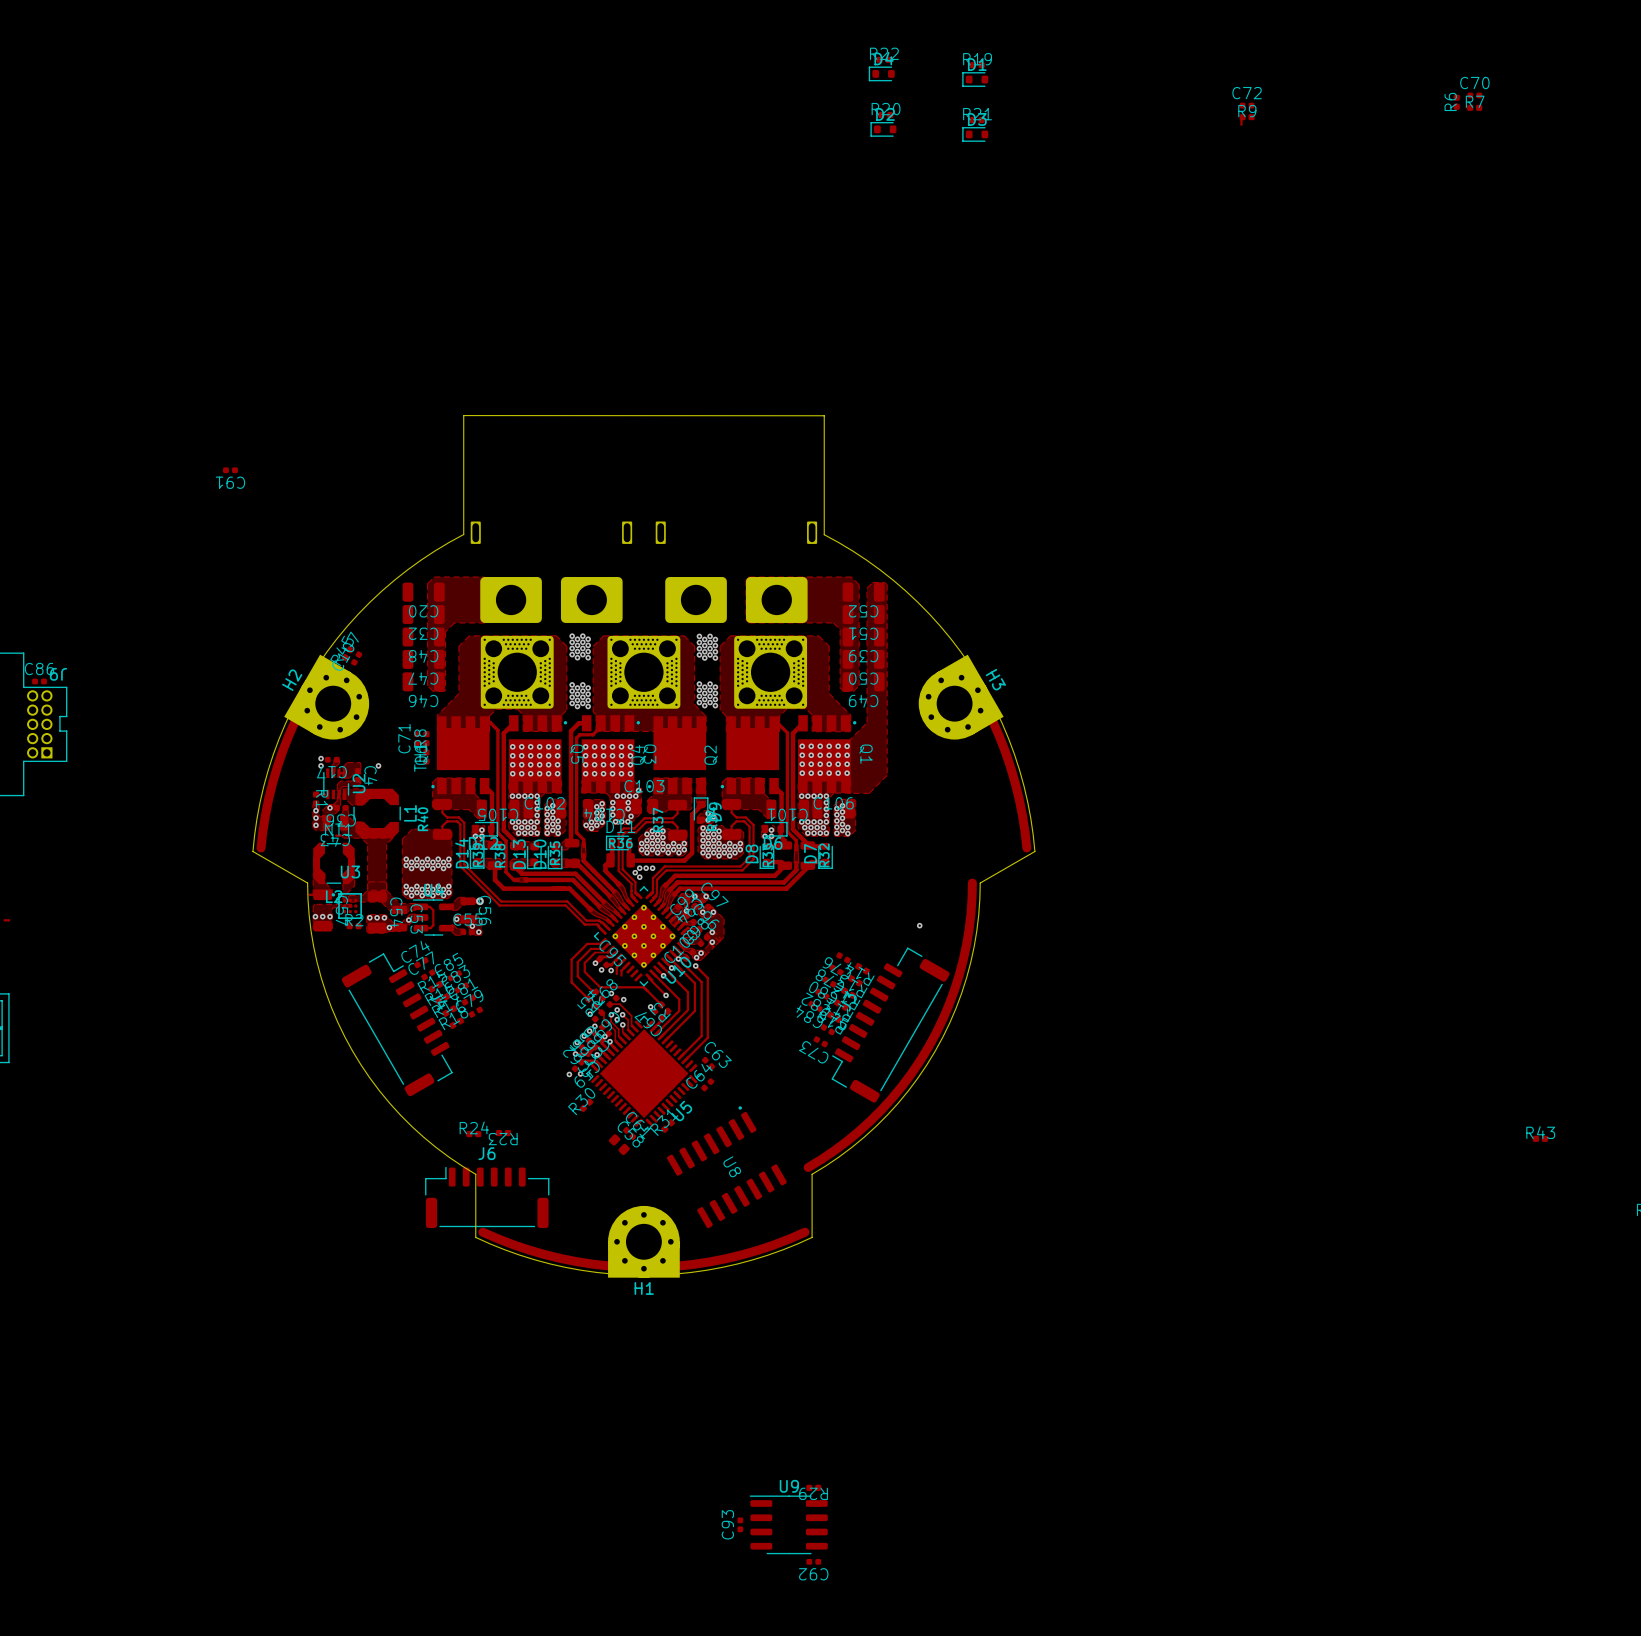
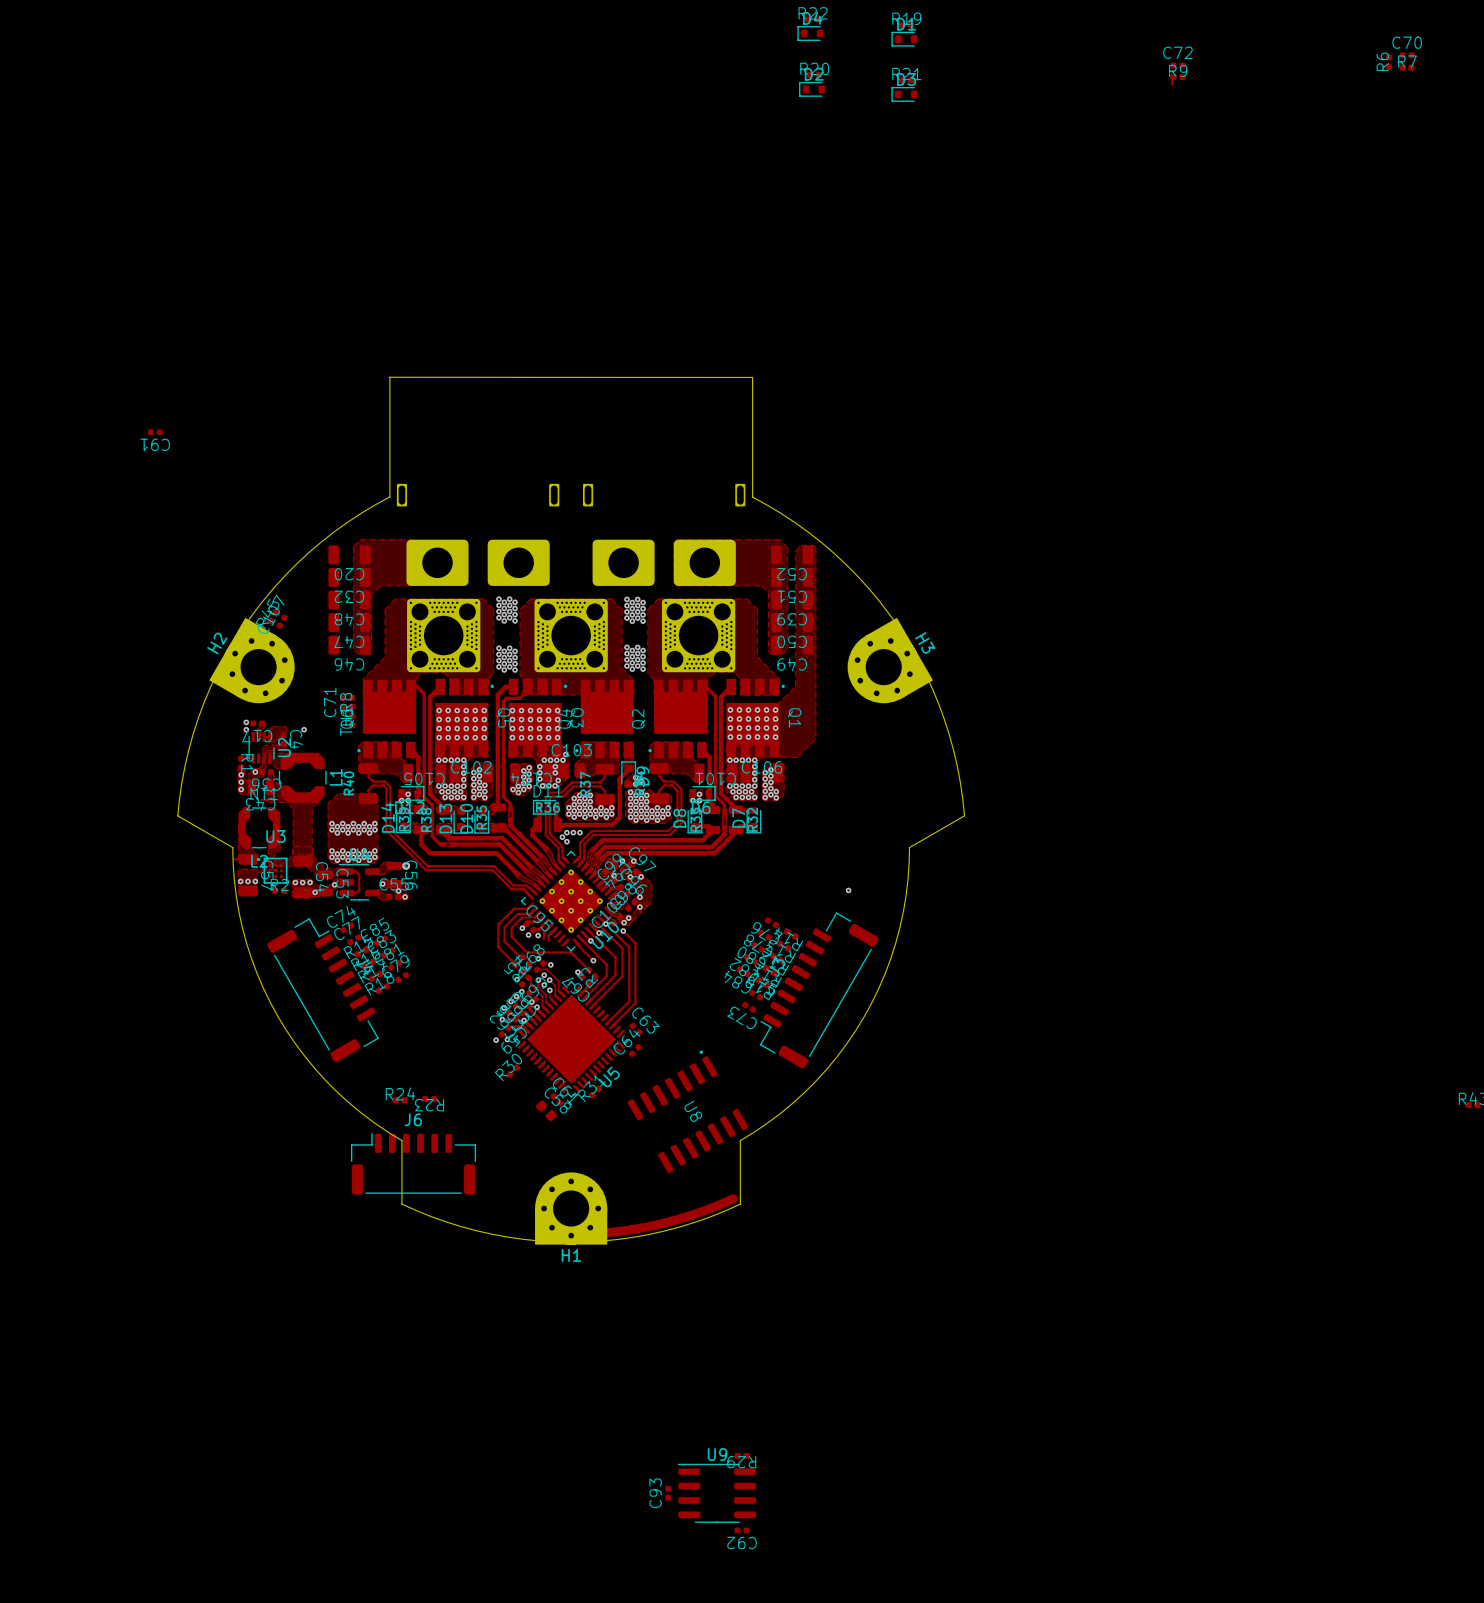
track: (310, 690) (295, 720) (277, 766) (268, 798) (260, 848) -> none
track: (976, 690) (999, 735) (1010, 766) (1019, 798) (1026, 848) -> none
track: (972, 883) (969, 929) (959, 975) (942, 1019) (928, 1047) (911, 1073) (881, 1109) (846, 1141) (808, 1167) -> none
U8 position: (726, 1167) -> (687, 1111)
track: (482, 1232) (529, 1250) (561, 1258) (610, 1266) (643, 1267) -> none

